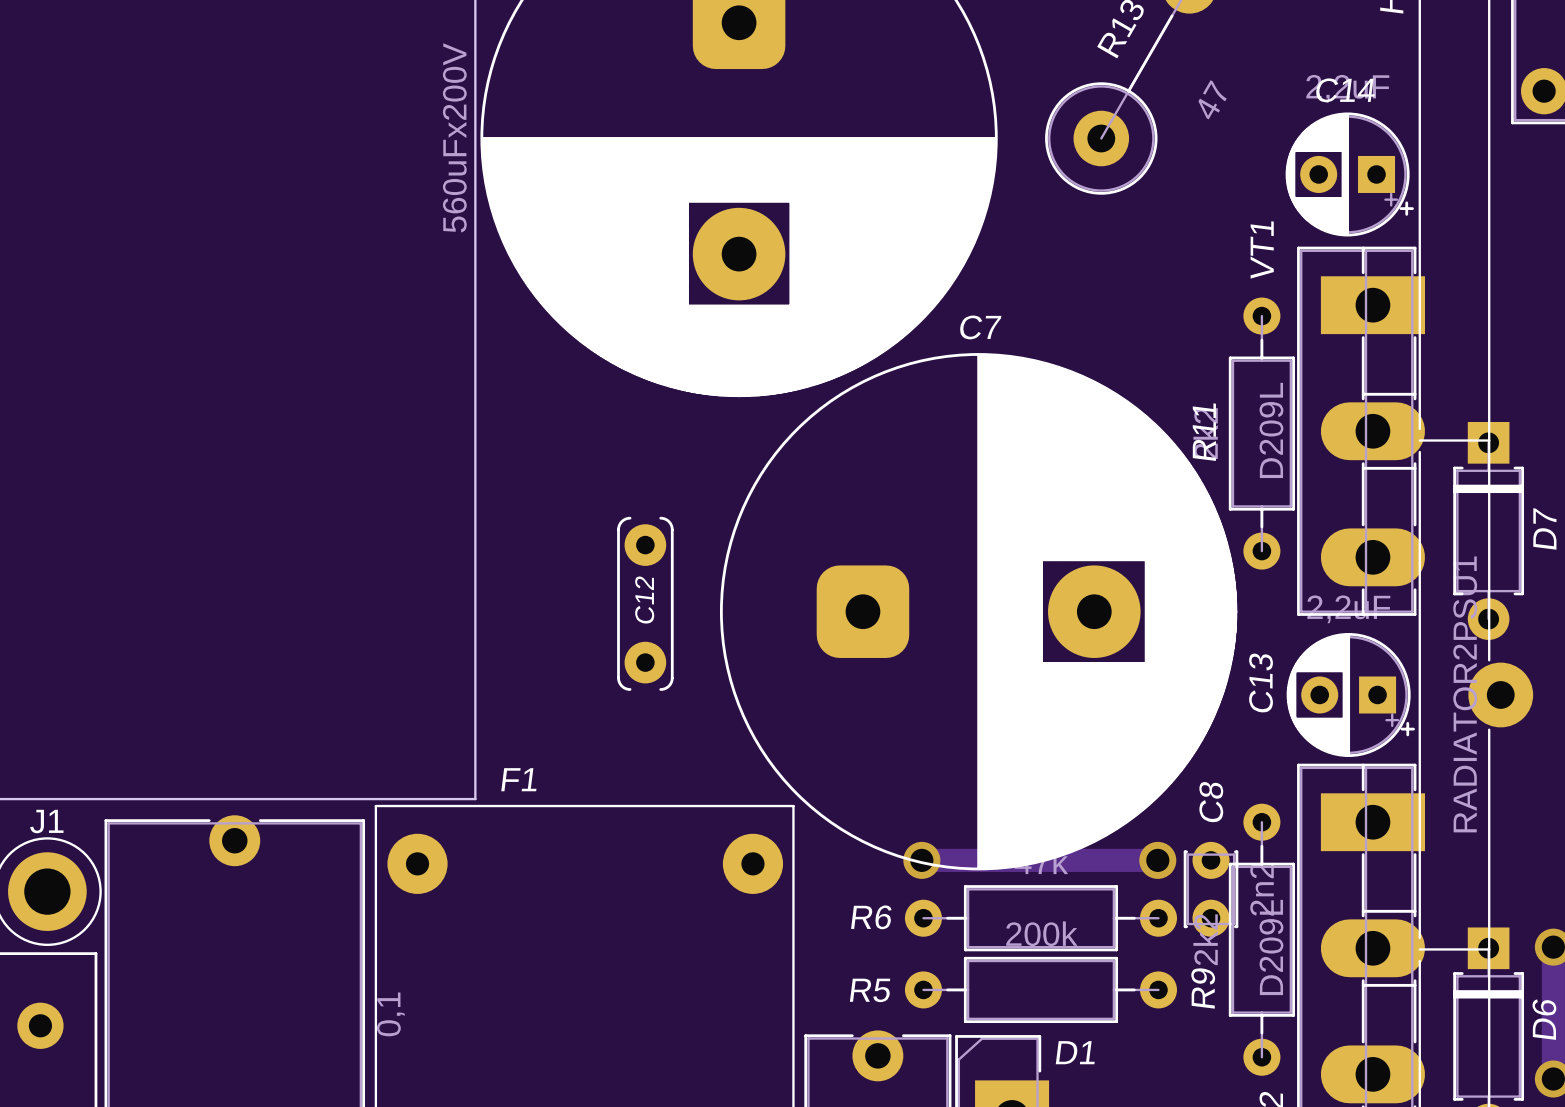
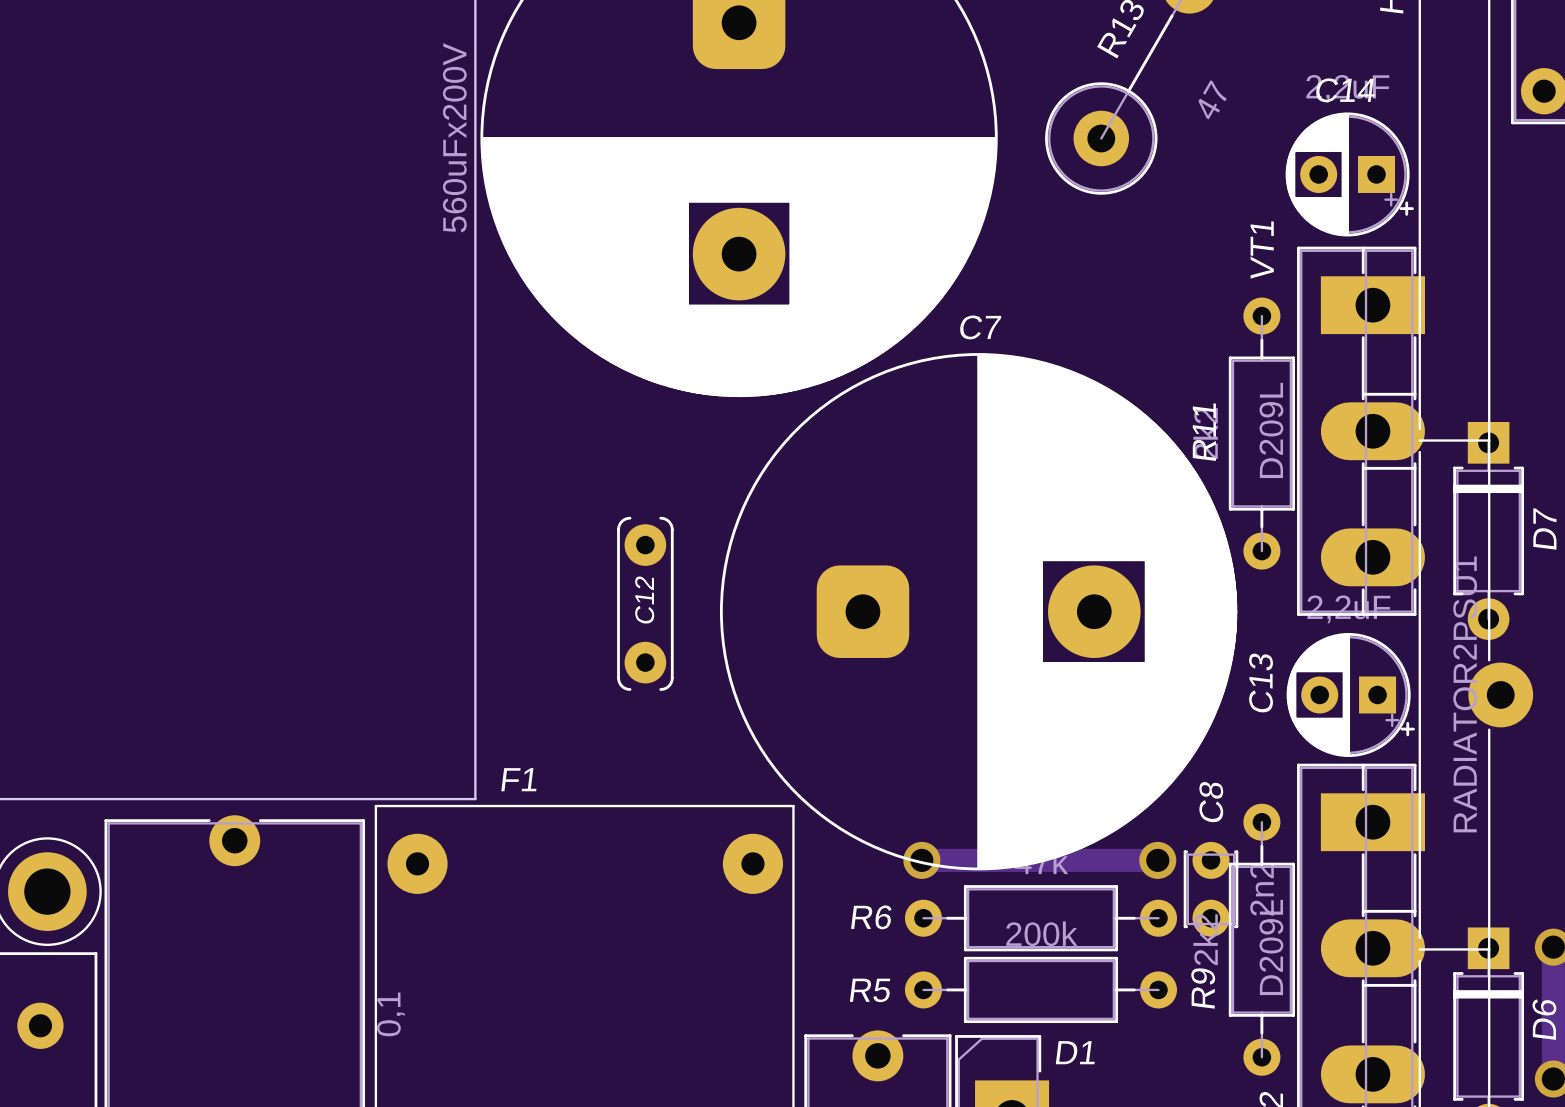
J1 name: J1 (46, 821) -> none

